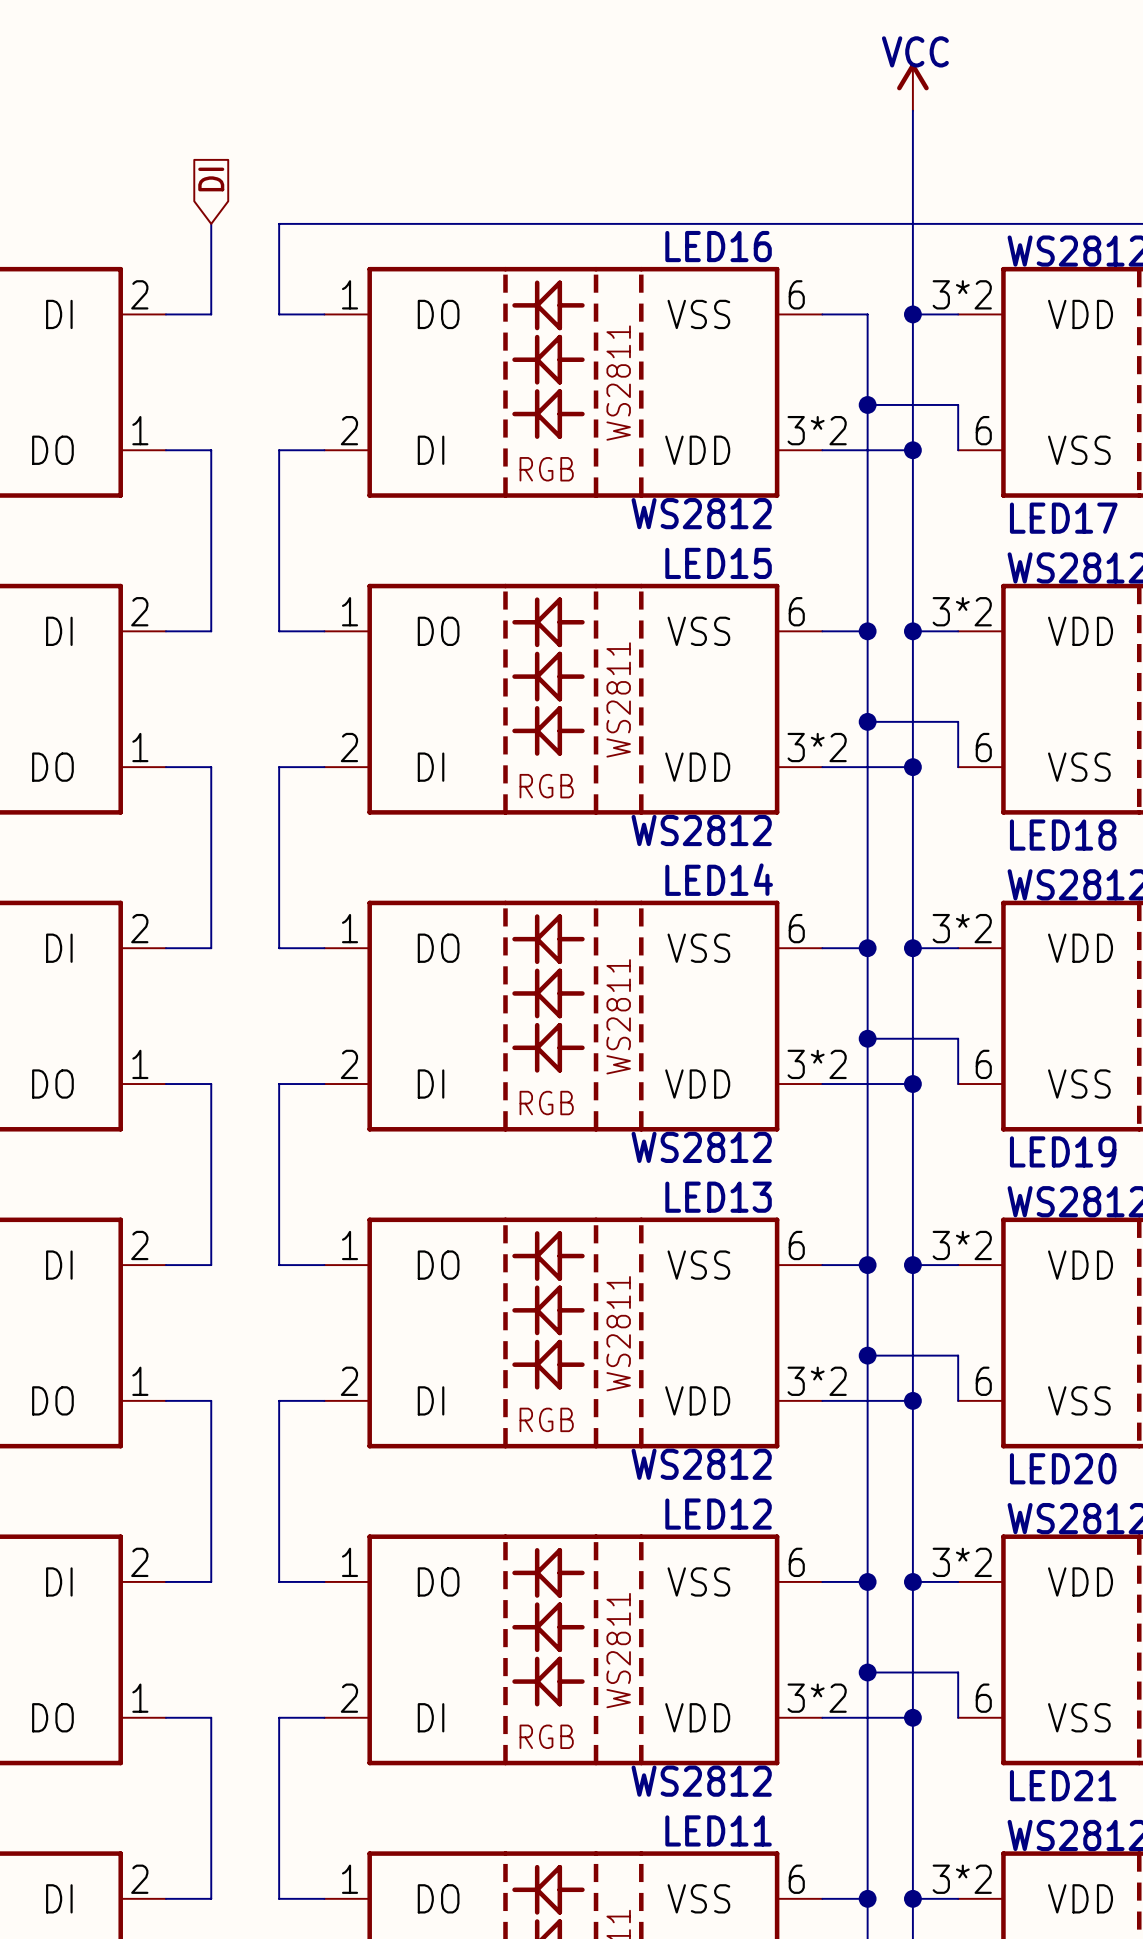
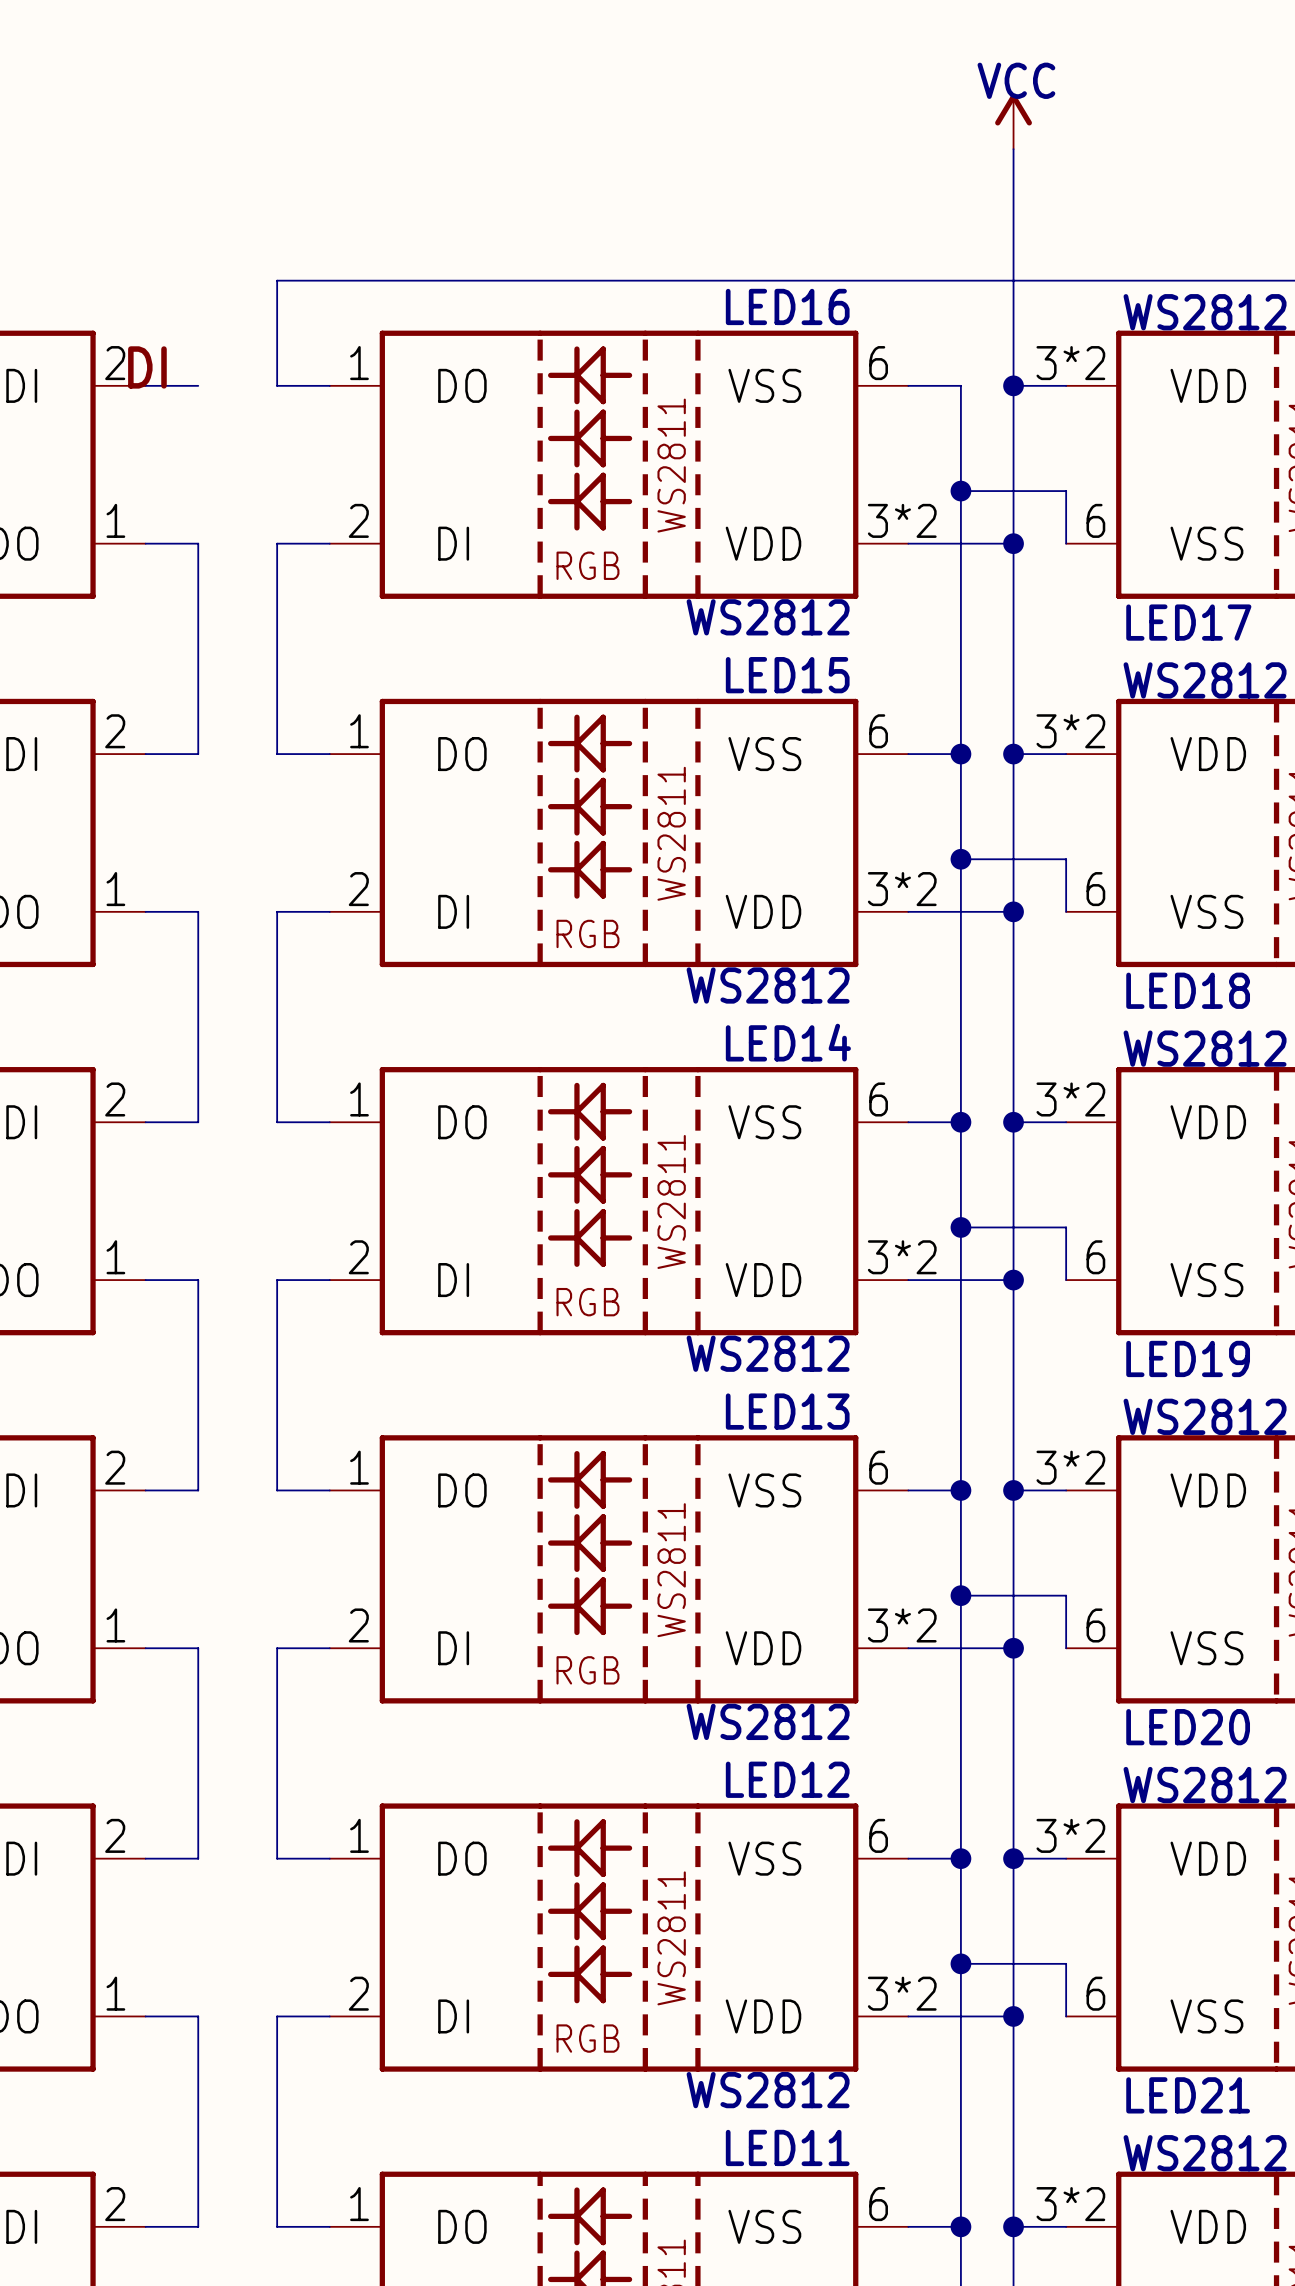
global label: DI (211, 179) -> none
wire: (211, 223) (211, 314) -> none
label: none -> DI (147, 367)

